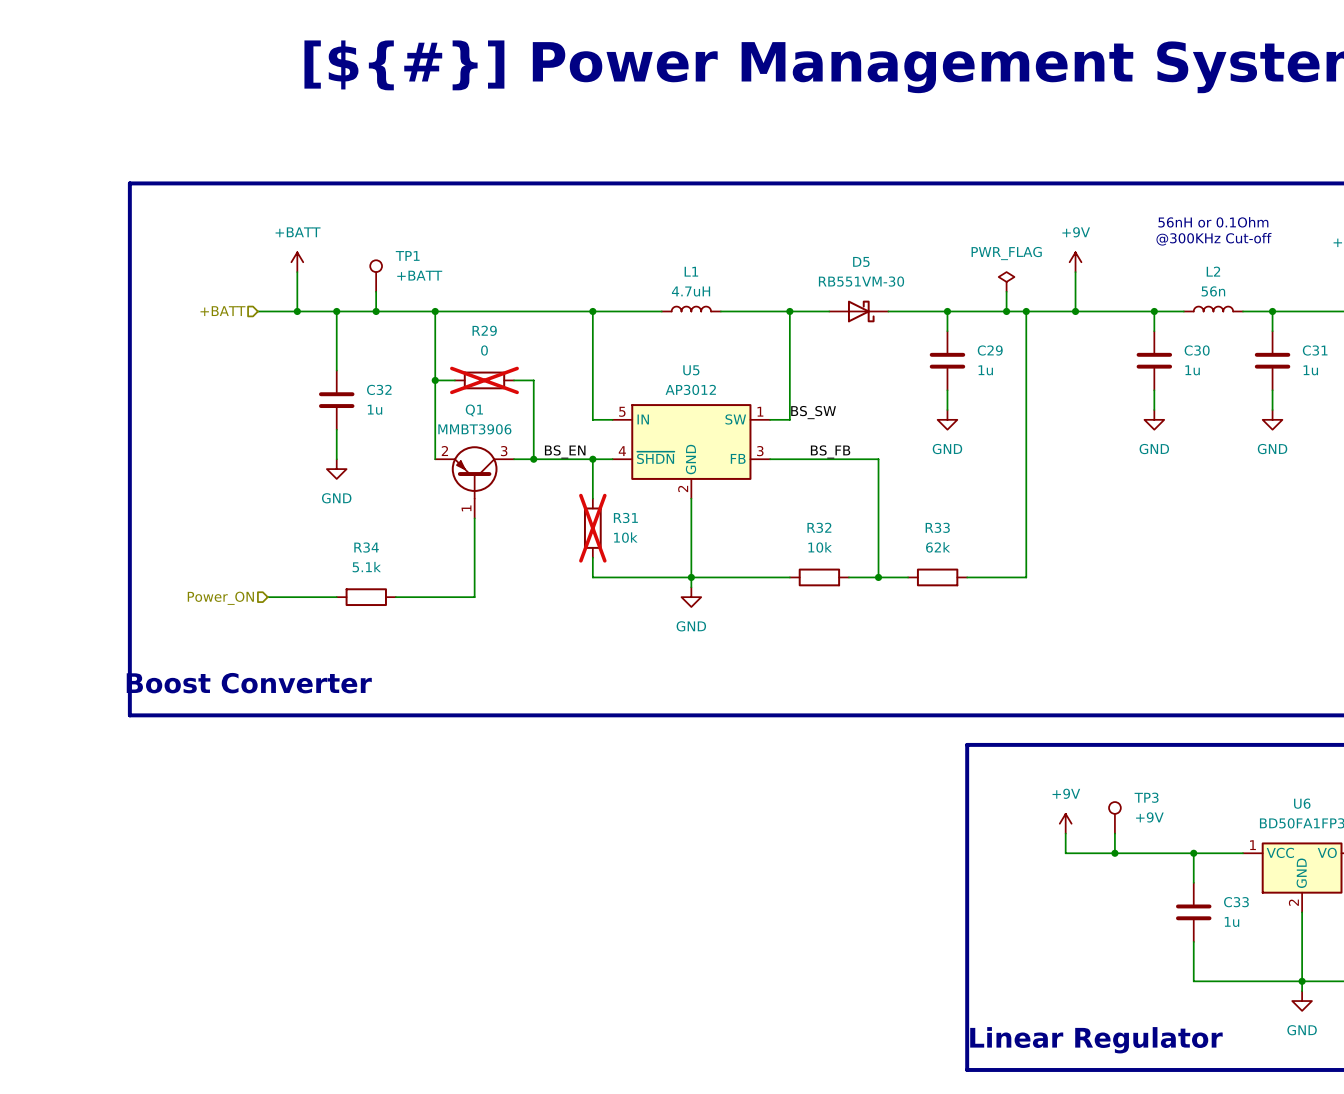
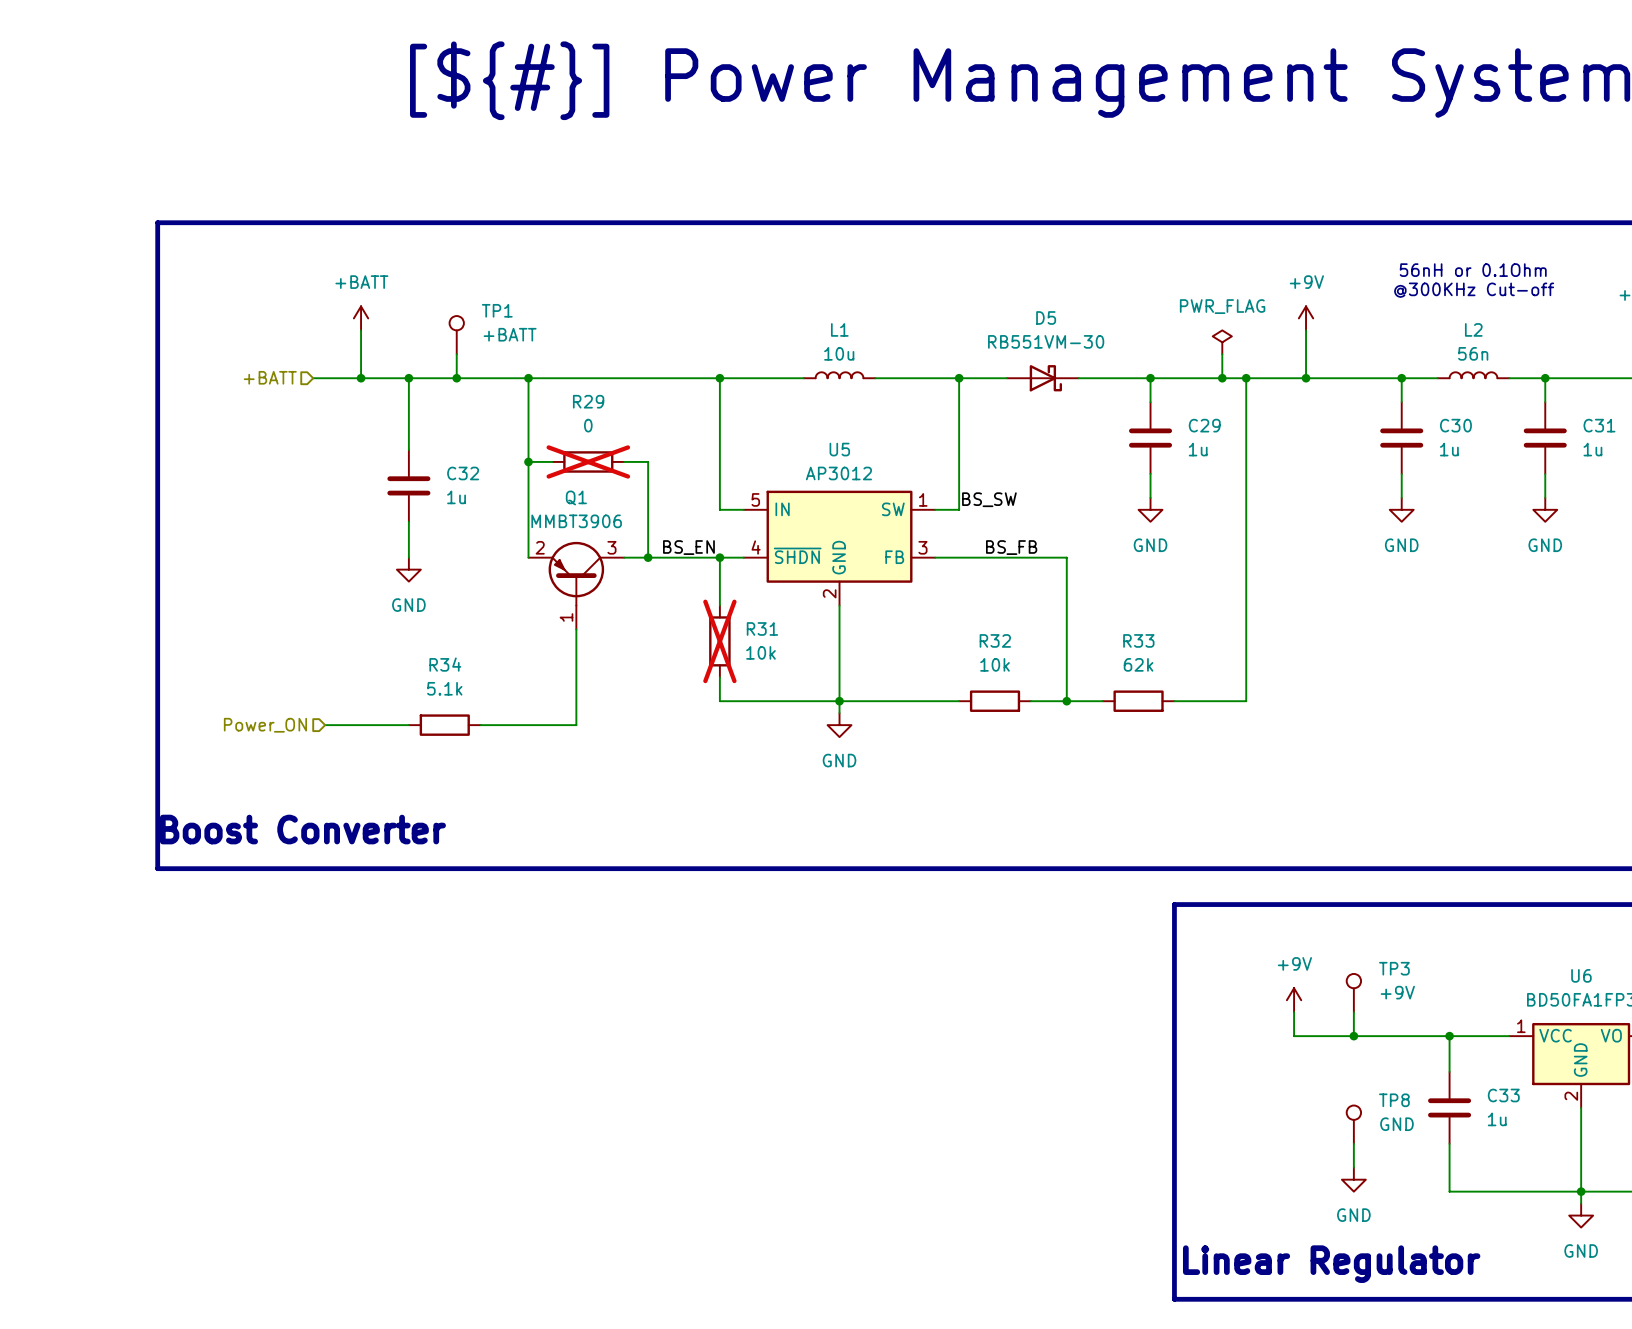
L1 value: 4.7uH (691, 291) -> 10u (839, 353)
TP8: none -> GND (1353, 1124)
wire: none -> (1353, 1143) (1353, 1167)
power symbol: none -> GND (1353, 1179)

